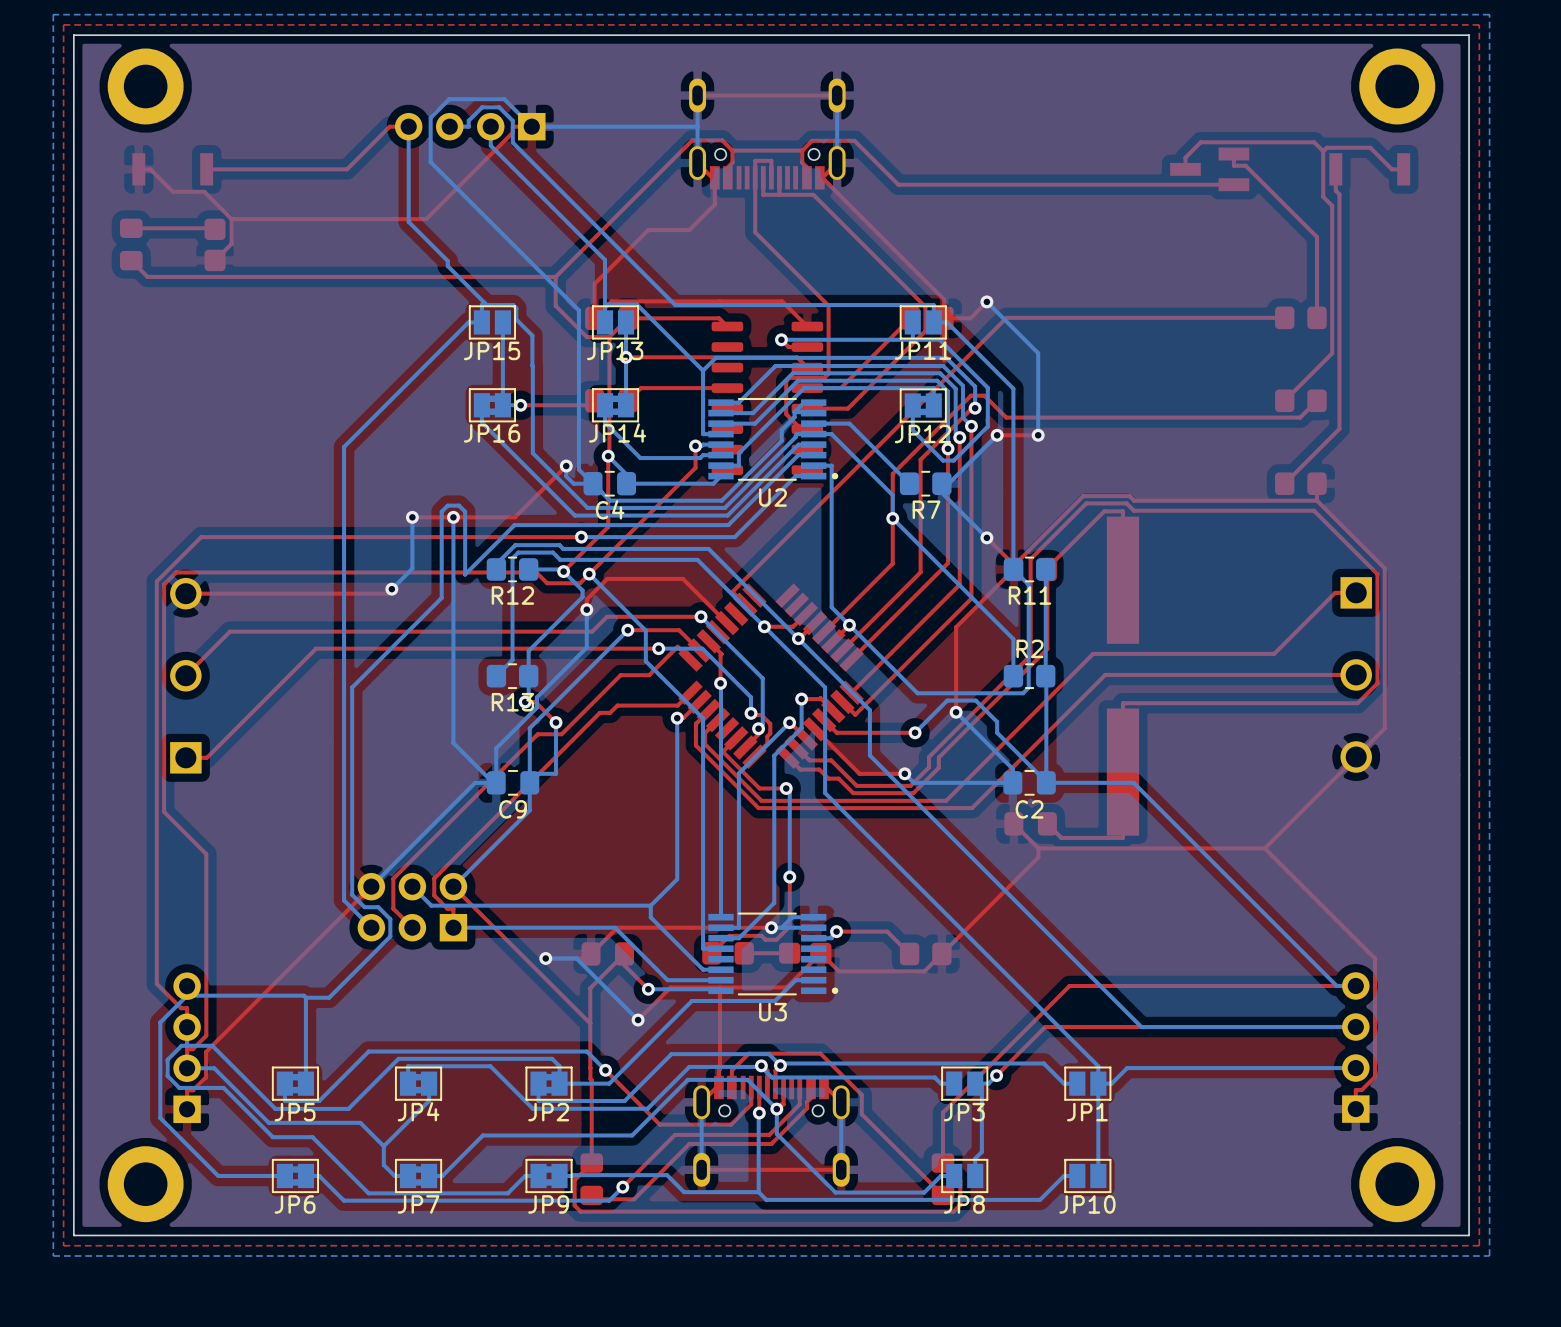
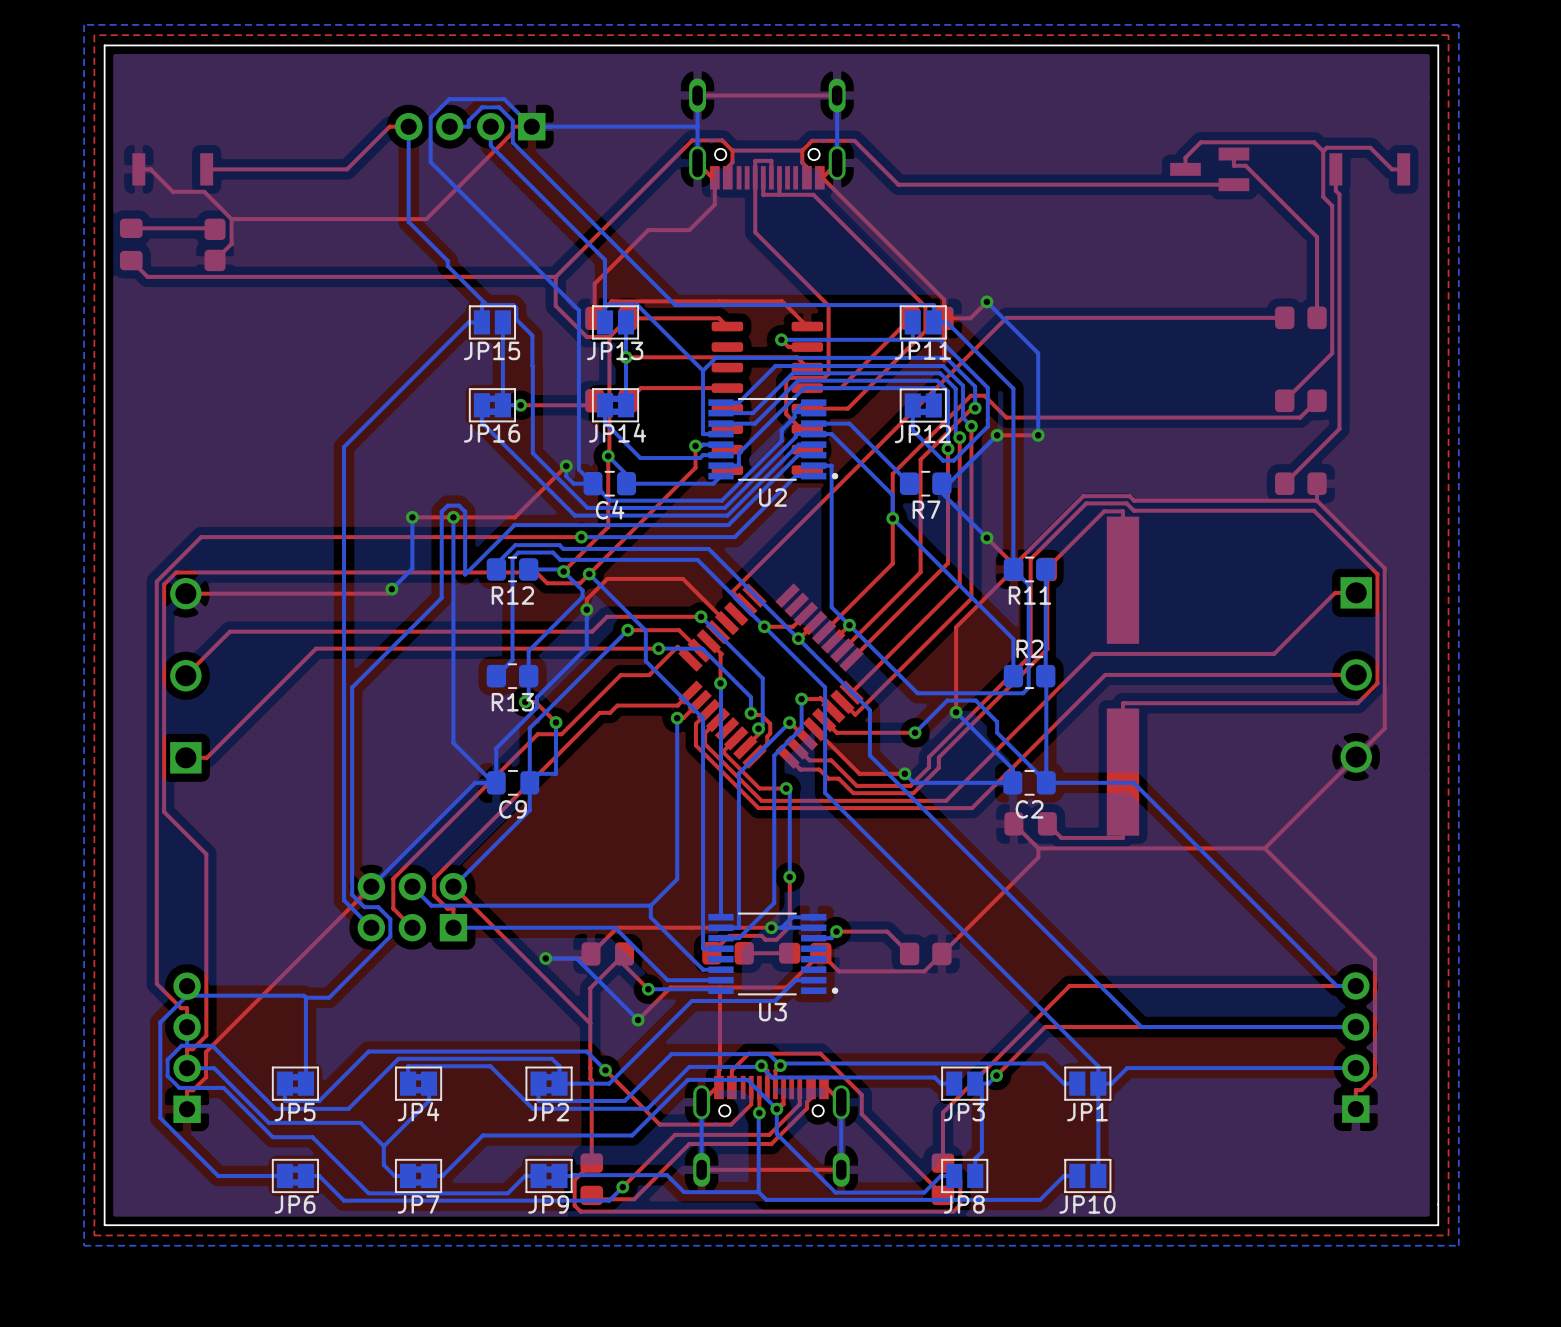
bottom zone outline: (1489, 14) (1489, 1255) (53, 1255) (53, 14) (1489, 14) -> (1458, 24) (1458, 1245) (84, 1245) (84, 24) (1458, 24)
top zone outline: (1479, 24) (1479, 1245) (63, 1245) (63, 24) (1479, 24) -> (1448, 35) (1448, 1235) (94, 1235) (94, 35) (1448, 35)
board edge: (1469, 35) (1469, 1235) (73, 1235) (73, 35) (1469, 35) -> (1438, 45) (1438, 1225) (104, 1225) (104, 45) (1438, 45)
part: (145, 86) -> none
part: (1397, 86) -> none
part: (145, 1184) -> none
part: (1397, 1184) -> none

